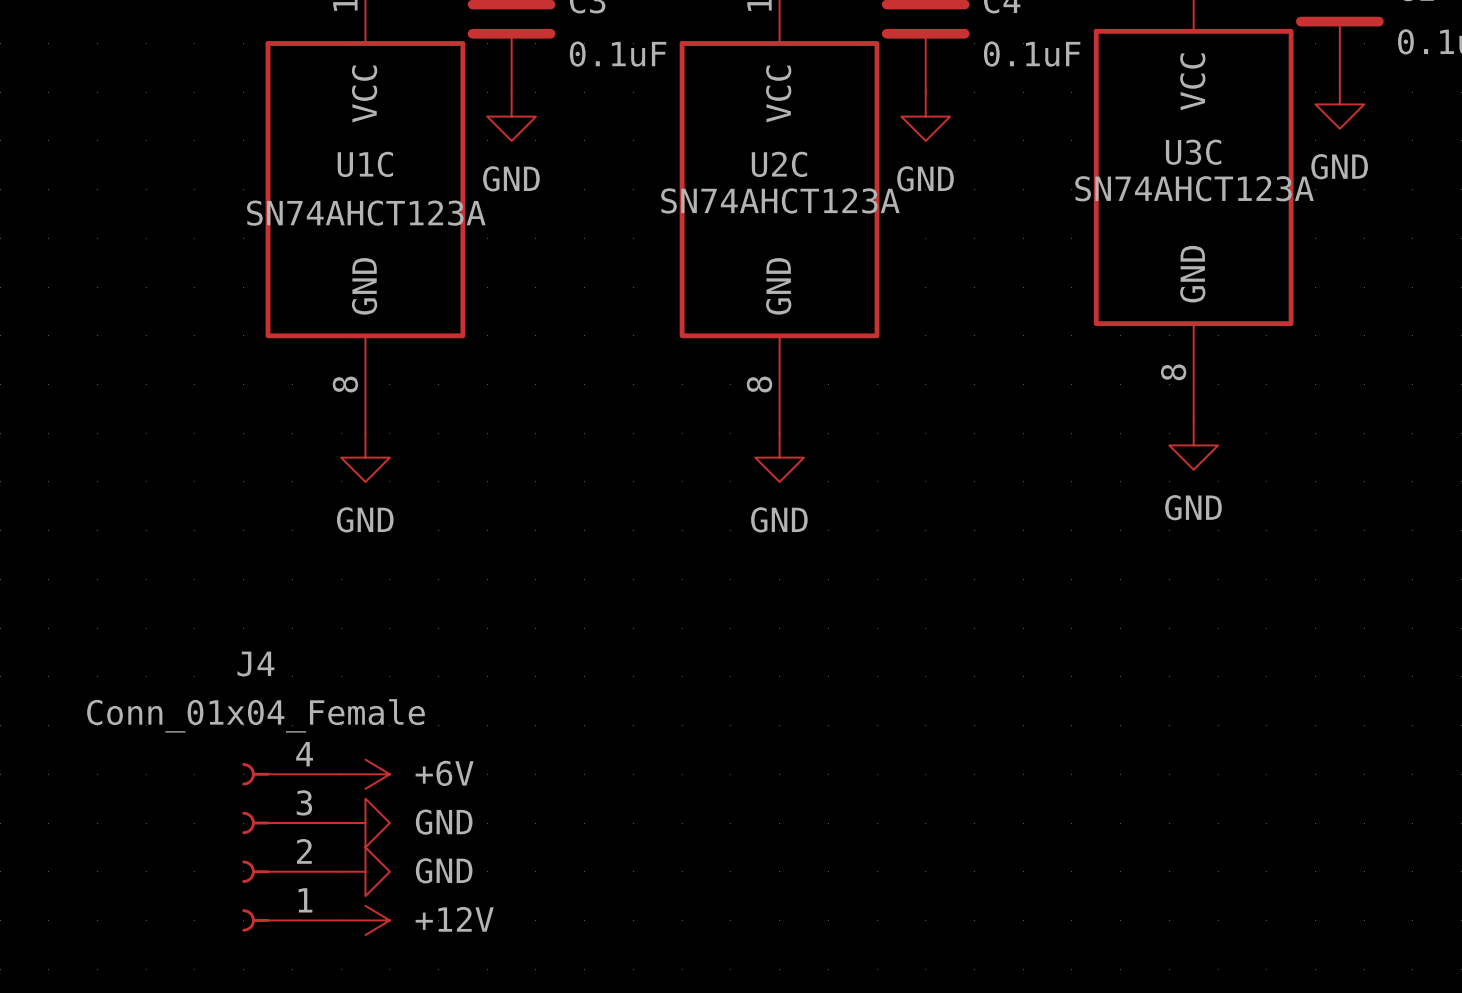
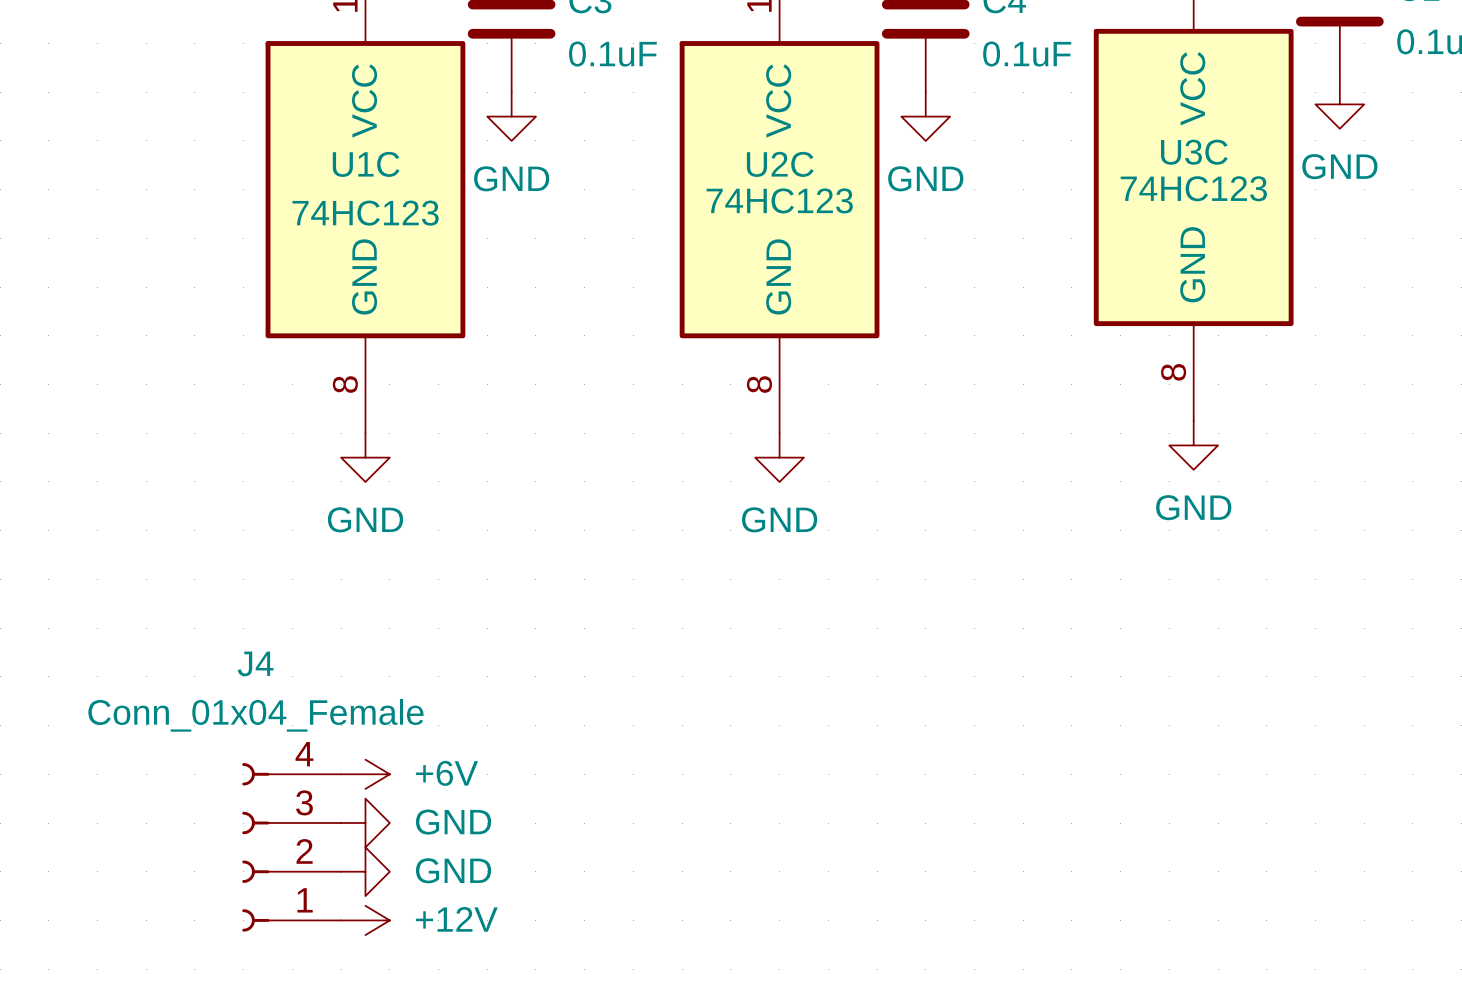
U3C value: SN74AHCT123A (1194, 188) -> 74HC123 (1193, 188)
U2C value: SN74AHCT123A (780, 200) -> 74HC123 (779, 200)
U1C value: SN74AHCT123A (366, 213) -> 74HC123 (365, 213)

